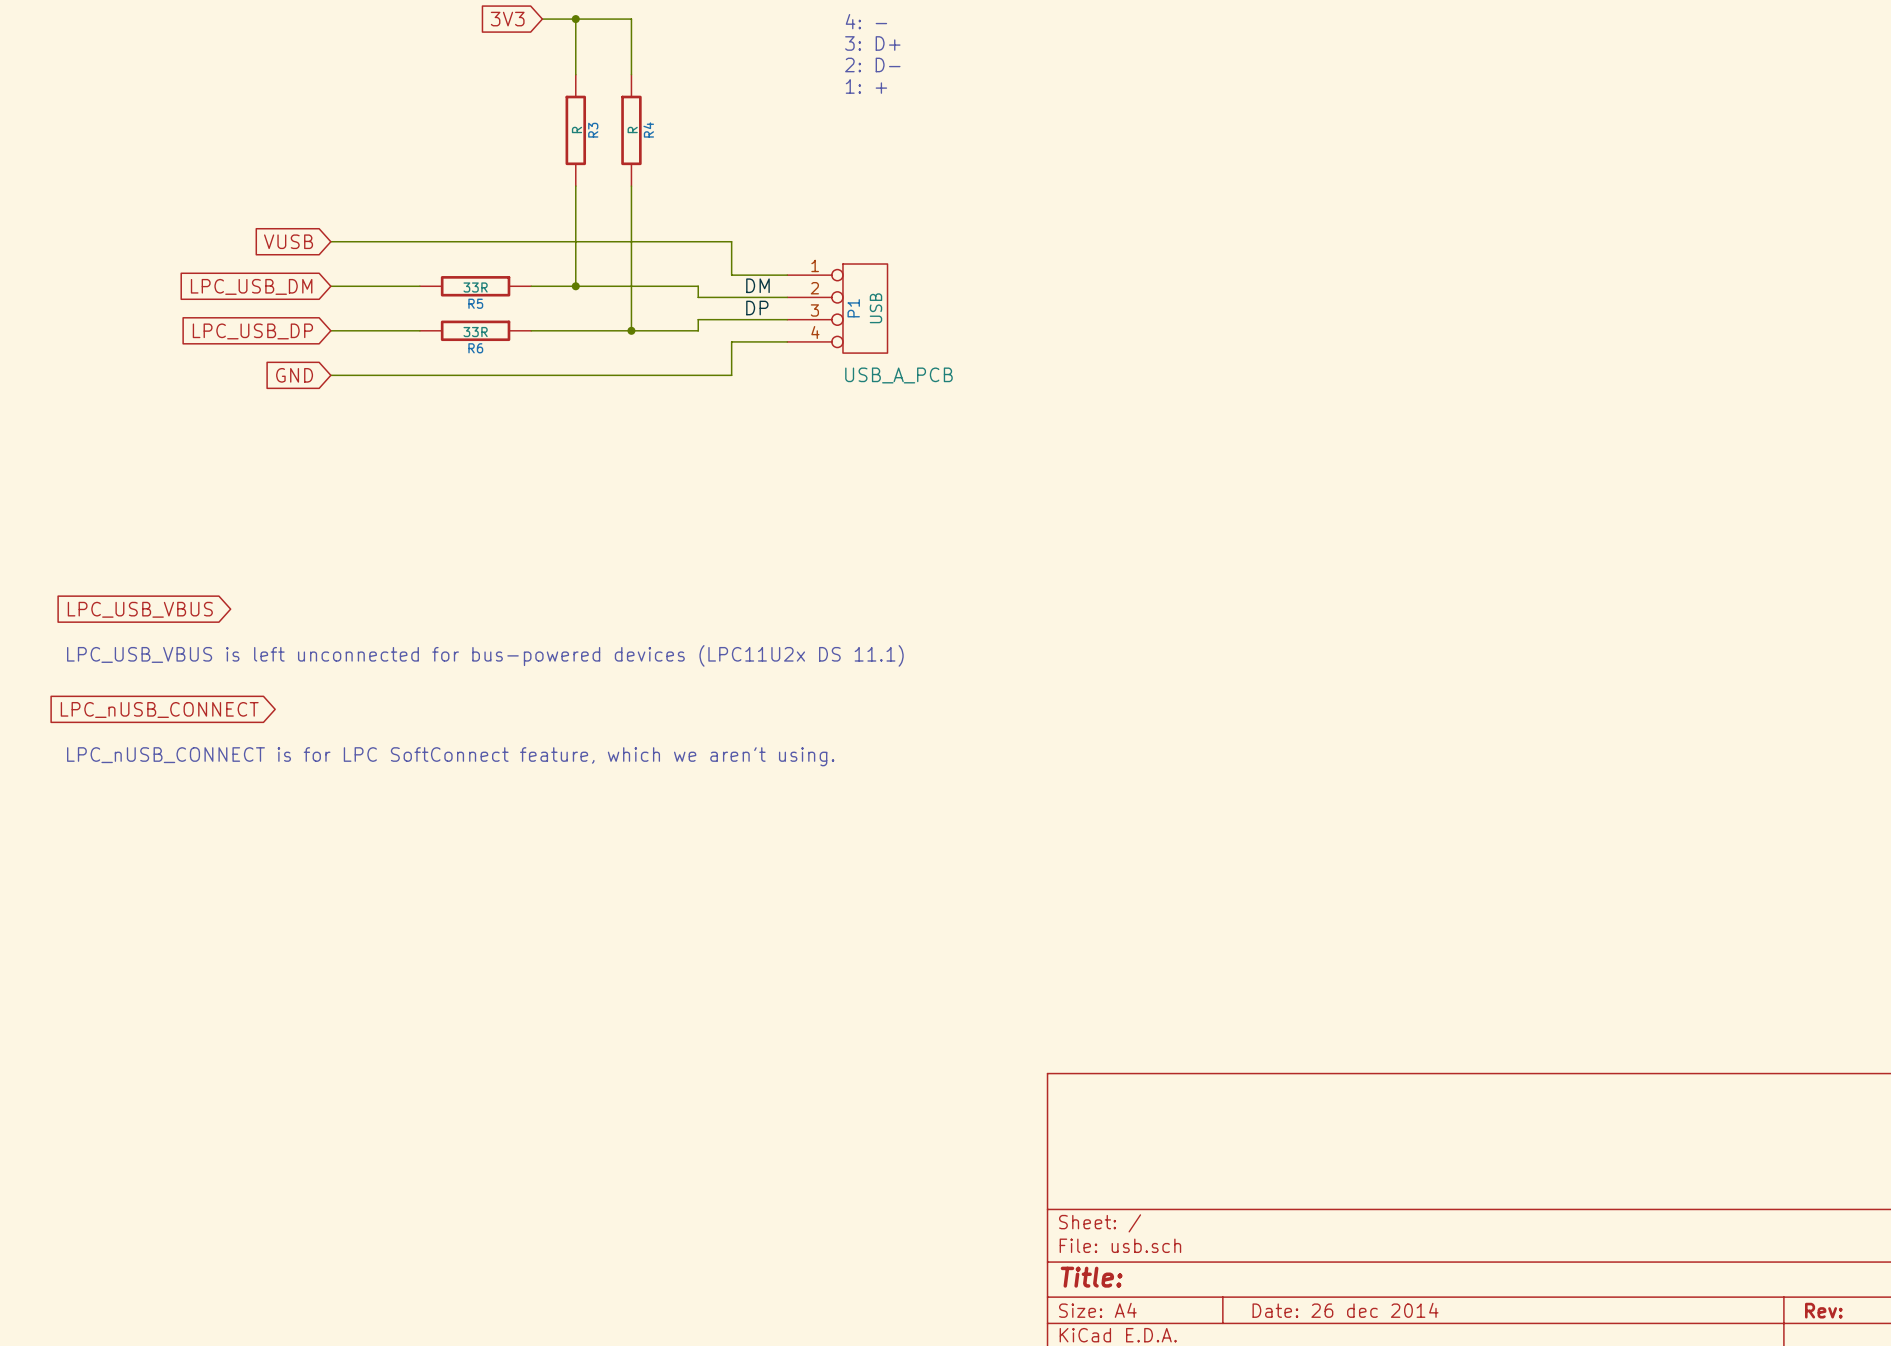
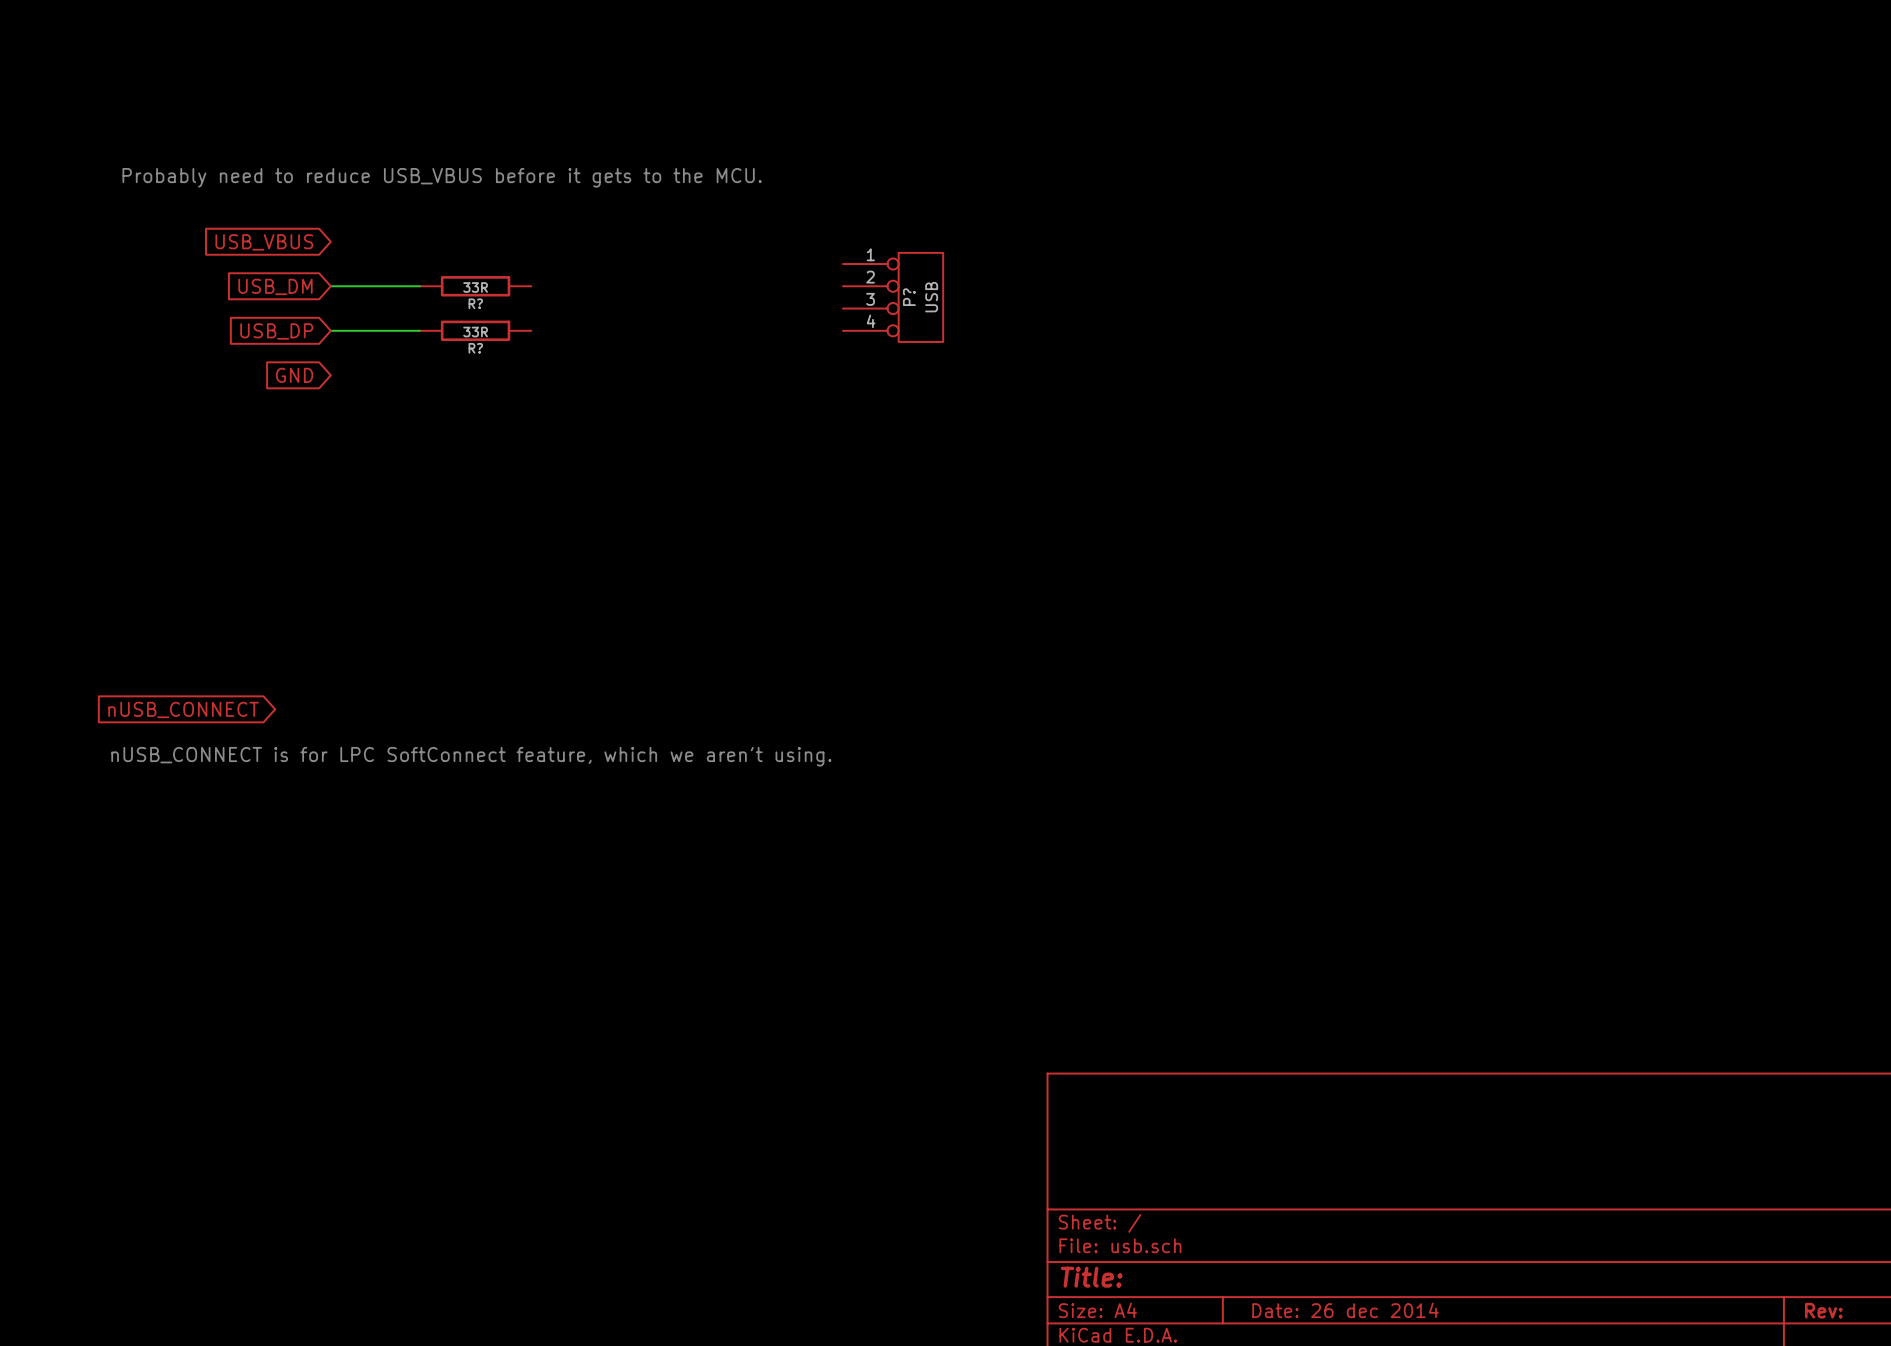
global label: 3V3 (507, 19) -> none
wire: (542, 19) (631, 19) (631, 74) -> none
wire: (575, 19) (575, 74) -> none
junction: (575, 19) -> none
text: 4: - (866, 21) -> none
text: 3: D+ (872, 43) -> none
text: 2: D- (872, 64) -> none
text: 1: + (866, 86) -> none
R3: R (575, 130) -> none
R4: R (631, 130) -> none
text: none -> Probably need to reduce USB_VBUS before it gets to the MCU. (442, 177)
wire: (575, 186) (575, 286) -> none
wire: (631, 186) (631, 330) -> none
global label: VUSB (288, 241) -> USB_VBUS (264, 242)
wire: (330, 241) (731, 241) (731, 275) (787, 275) -> none
label: DM (757, 285) -> none
global label: LPC_USB_DM (251, 286) -> USB_DM (275, 286)
wire: (531, 286) (698, 286) (698, 297) (787, 297) -> none
junction: (575, 286) -> none
P?: none -> USB (893, 297)
R5 name: R5 (475, 303) -> R? (475, 303)
label: DP (757, 308) -> none
P1: USB (837, 308) -> none
wire: (787, 319) (698, 319) (698, 330) (531, 330) -> none
junction: (631, 330) -> none
global label: LPC_USB_DP (252, 331) -> USB_DP (276, 331)
wire: (787, 341) (731, 341) (731, 375) (330, 375) -> none
R6 name: R6 (475, 348) -> R? (475, 348)
global label: LPC_USB_VBUS (140, 609) -> none
text: LPC_USB_VBUS is left unconnected for bus-powered devices (LPC11U2x DS 11.1) (485, 655) -> none
global label: LPC_nUSB_CONNECT (159, 709) -> nUSB_CONNECT (183, 709)
text: LPC_nUSB_CONNECT is for LPC SoftConnect feature, which we aren't using. (450, 756) -> nUSB_CONNECT is for LPC SoftConnect feature, which we aren't using. (471, 756)

